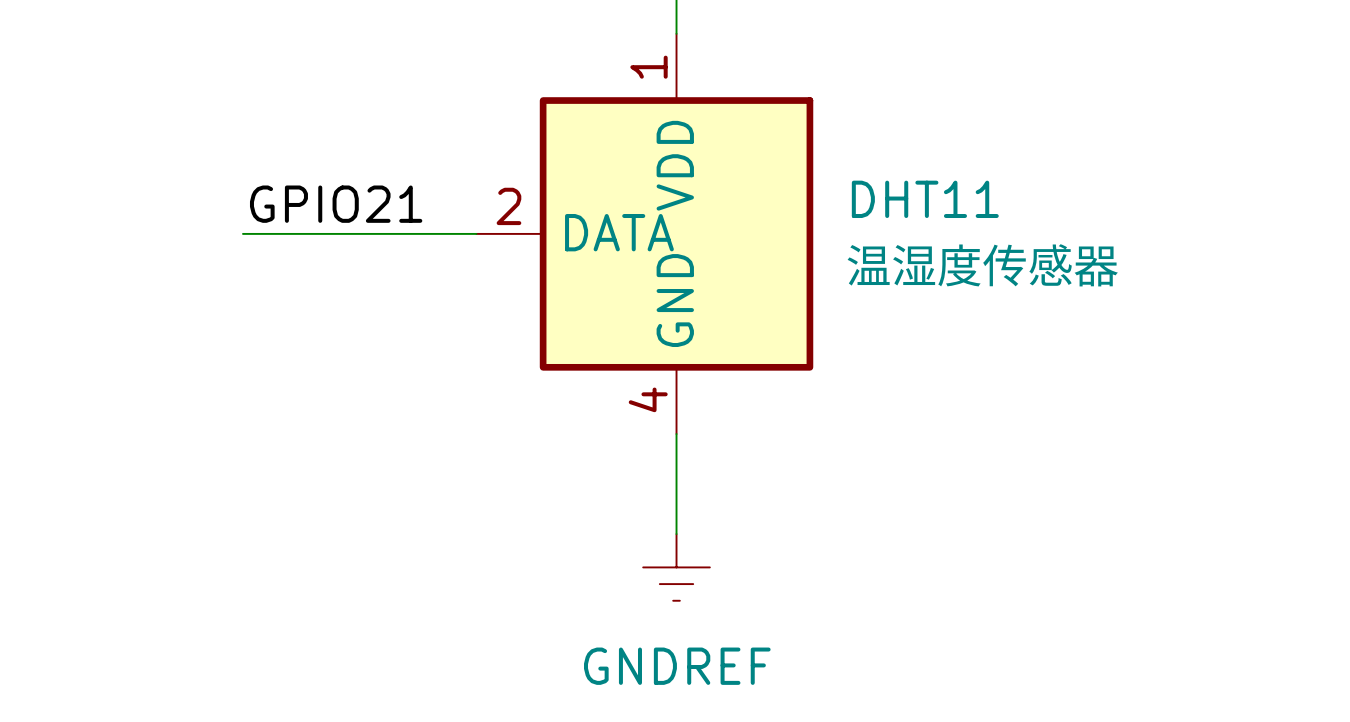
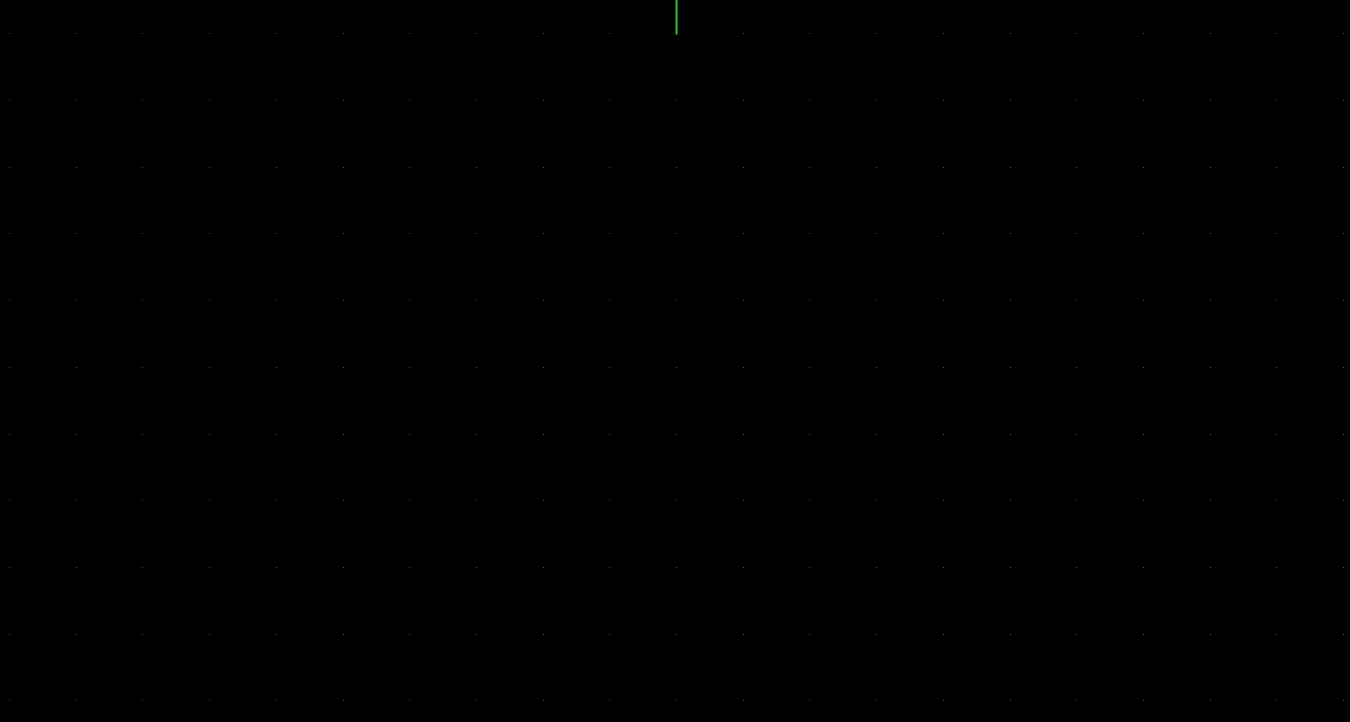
label: GPIO21 (336, 204) -> none
wire: (242, 233) (476, 233) -> none
温湿度传感器: DHT11 (644, 233) -> none
wire: (676, 434) (676, 534) -> none
power symbol: GNDREF (676, 567) -> none

